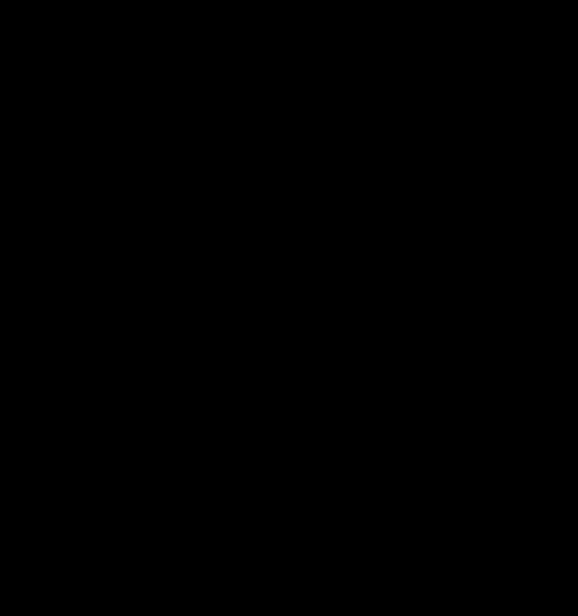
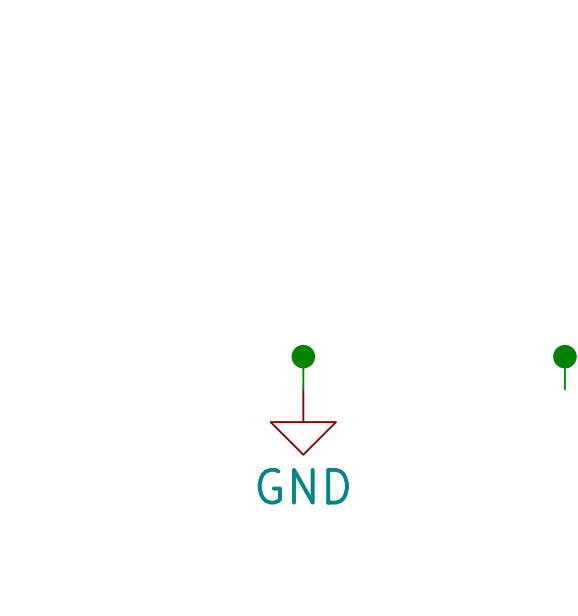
wire: none -> (303, 356) (303, 389)
junction: none -> (303, 356)
wire: none -> (564, 356) (564, 389)
junction: none -> (564, 356)
power symbol: none -> GND (303, 422)

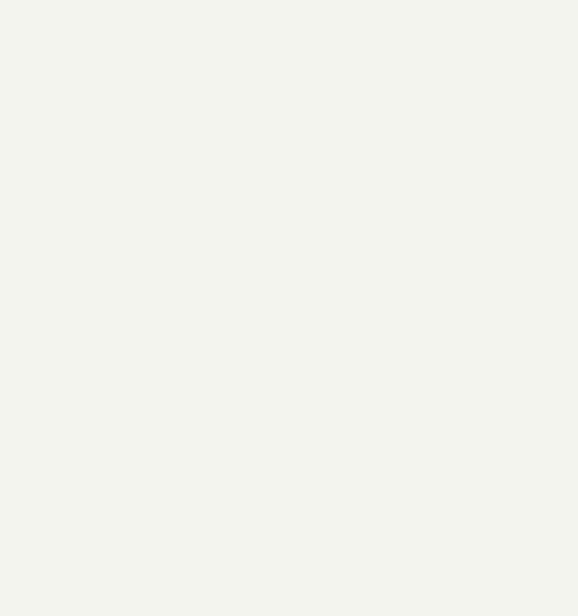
wire: (303, 356) (303, 389) -> none
junction: (303, 356) -> none
wire: (564, 356) (564, 389) -> none
junction: (564, 356) -> none
power symbol: GND (303, 422) -> none

